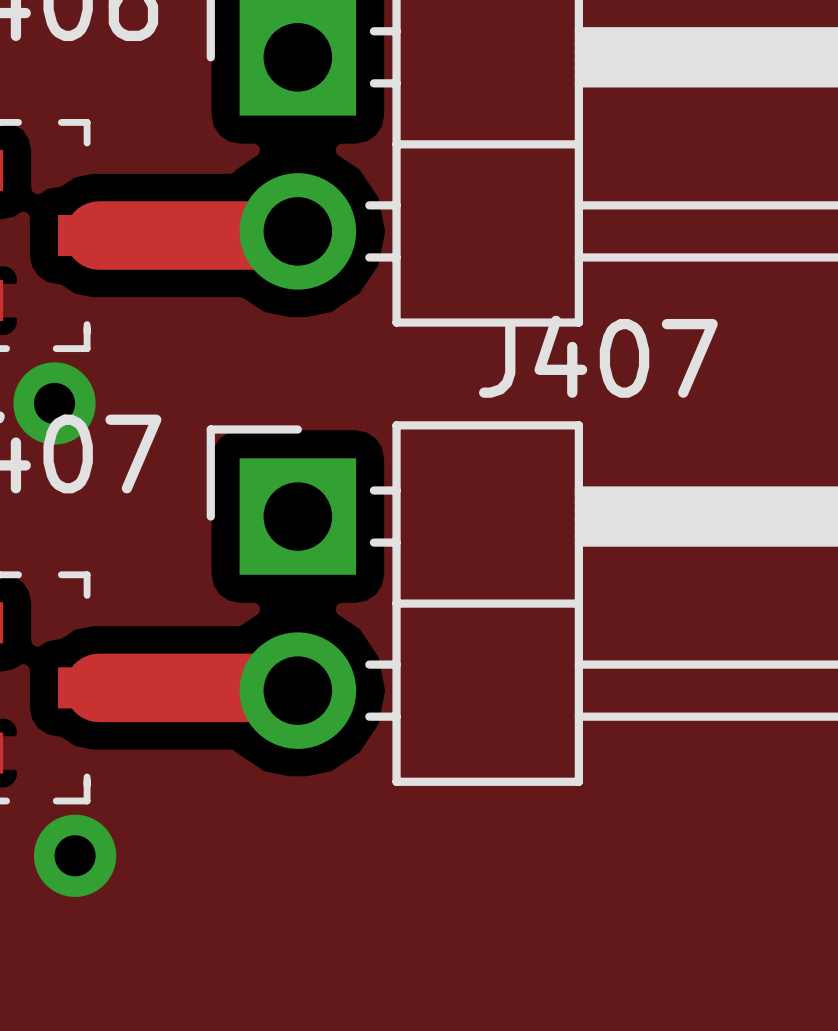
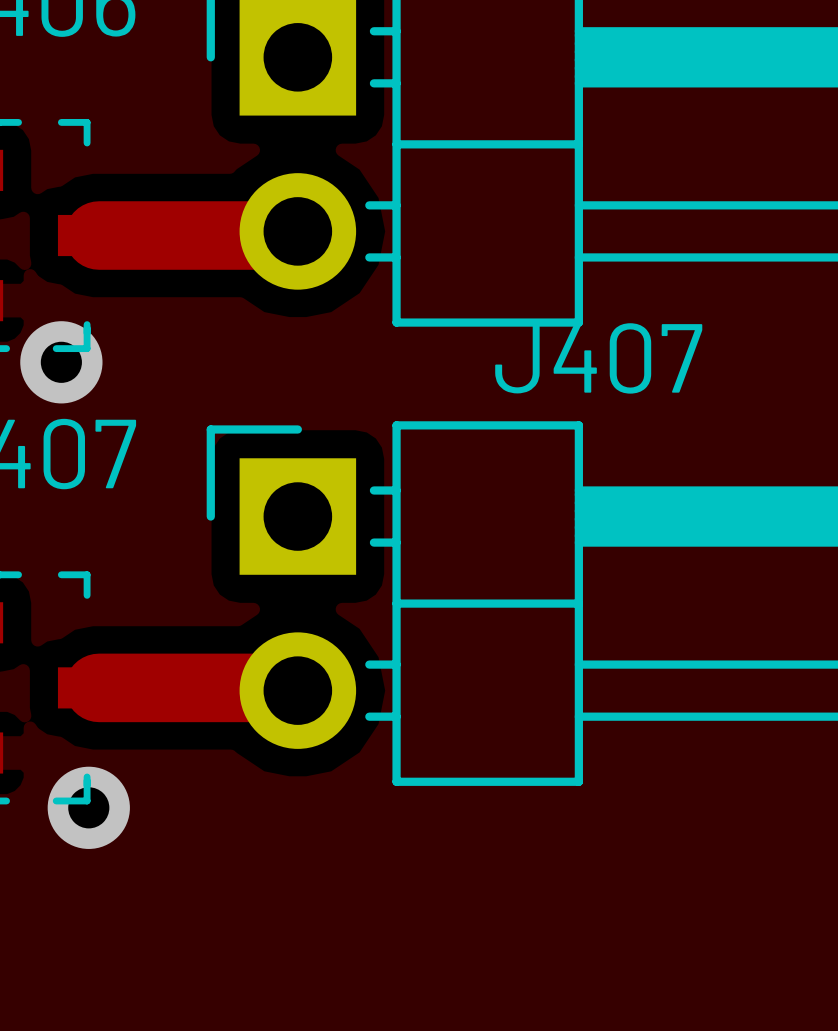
via position: (54, 403) -> (61, 362)
via position: (75, 855) -> (88, 807)

